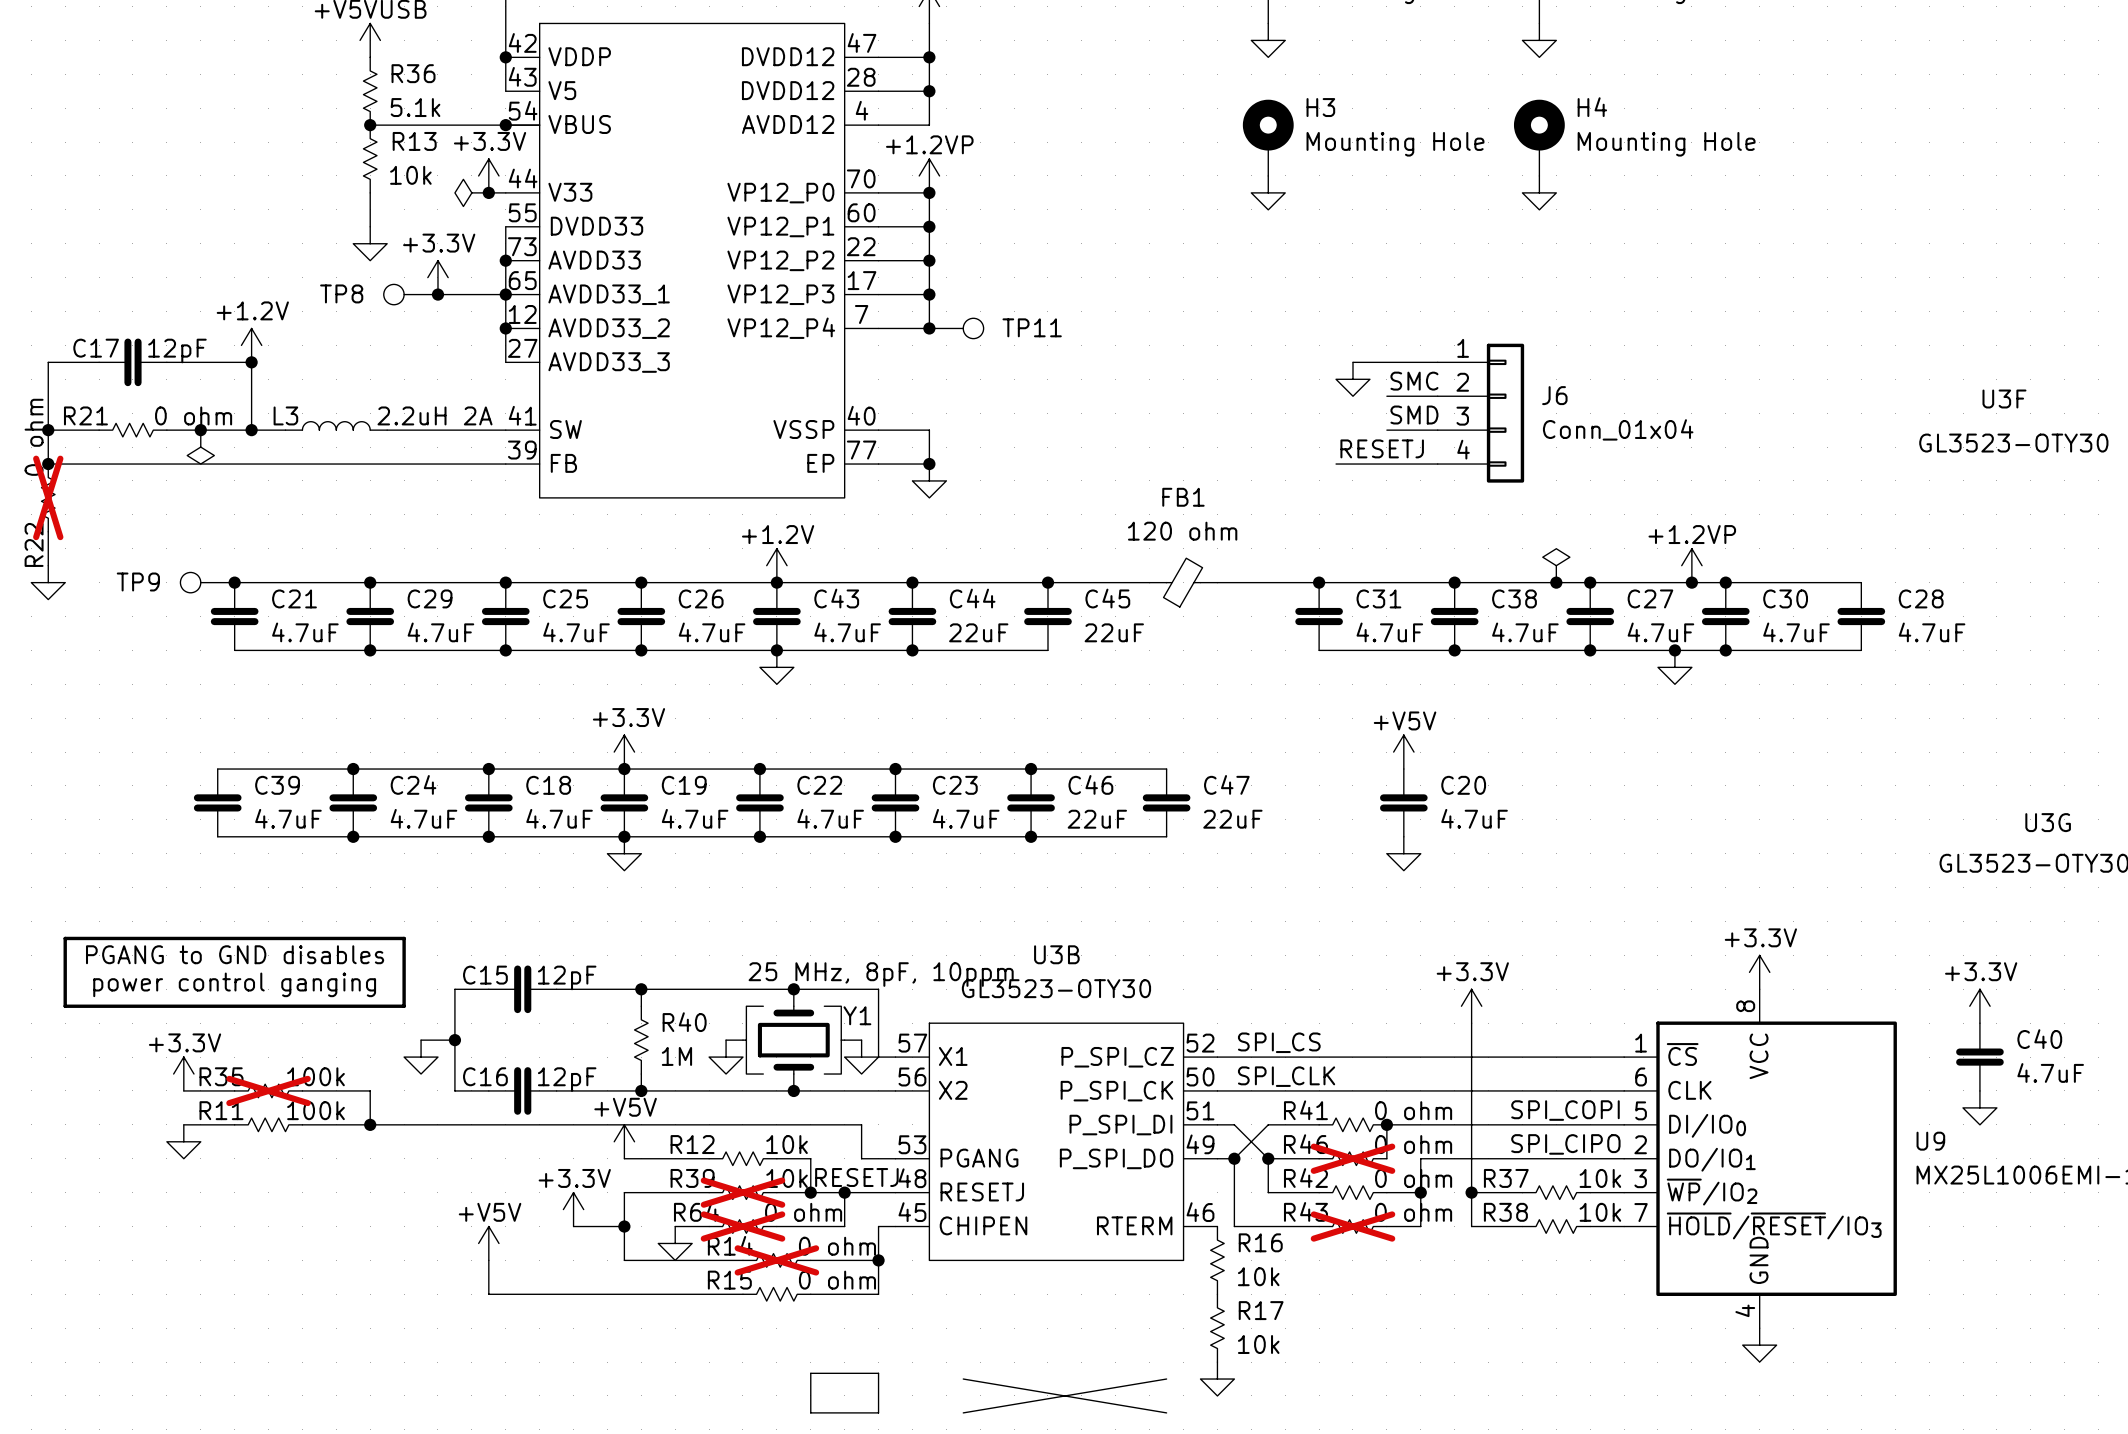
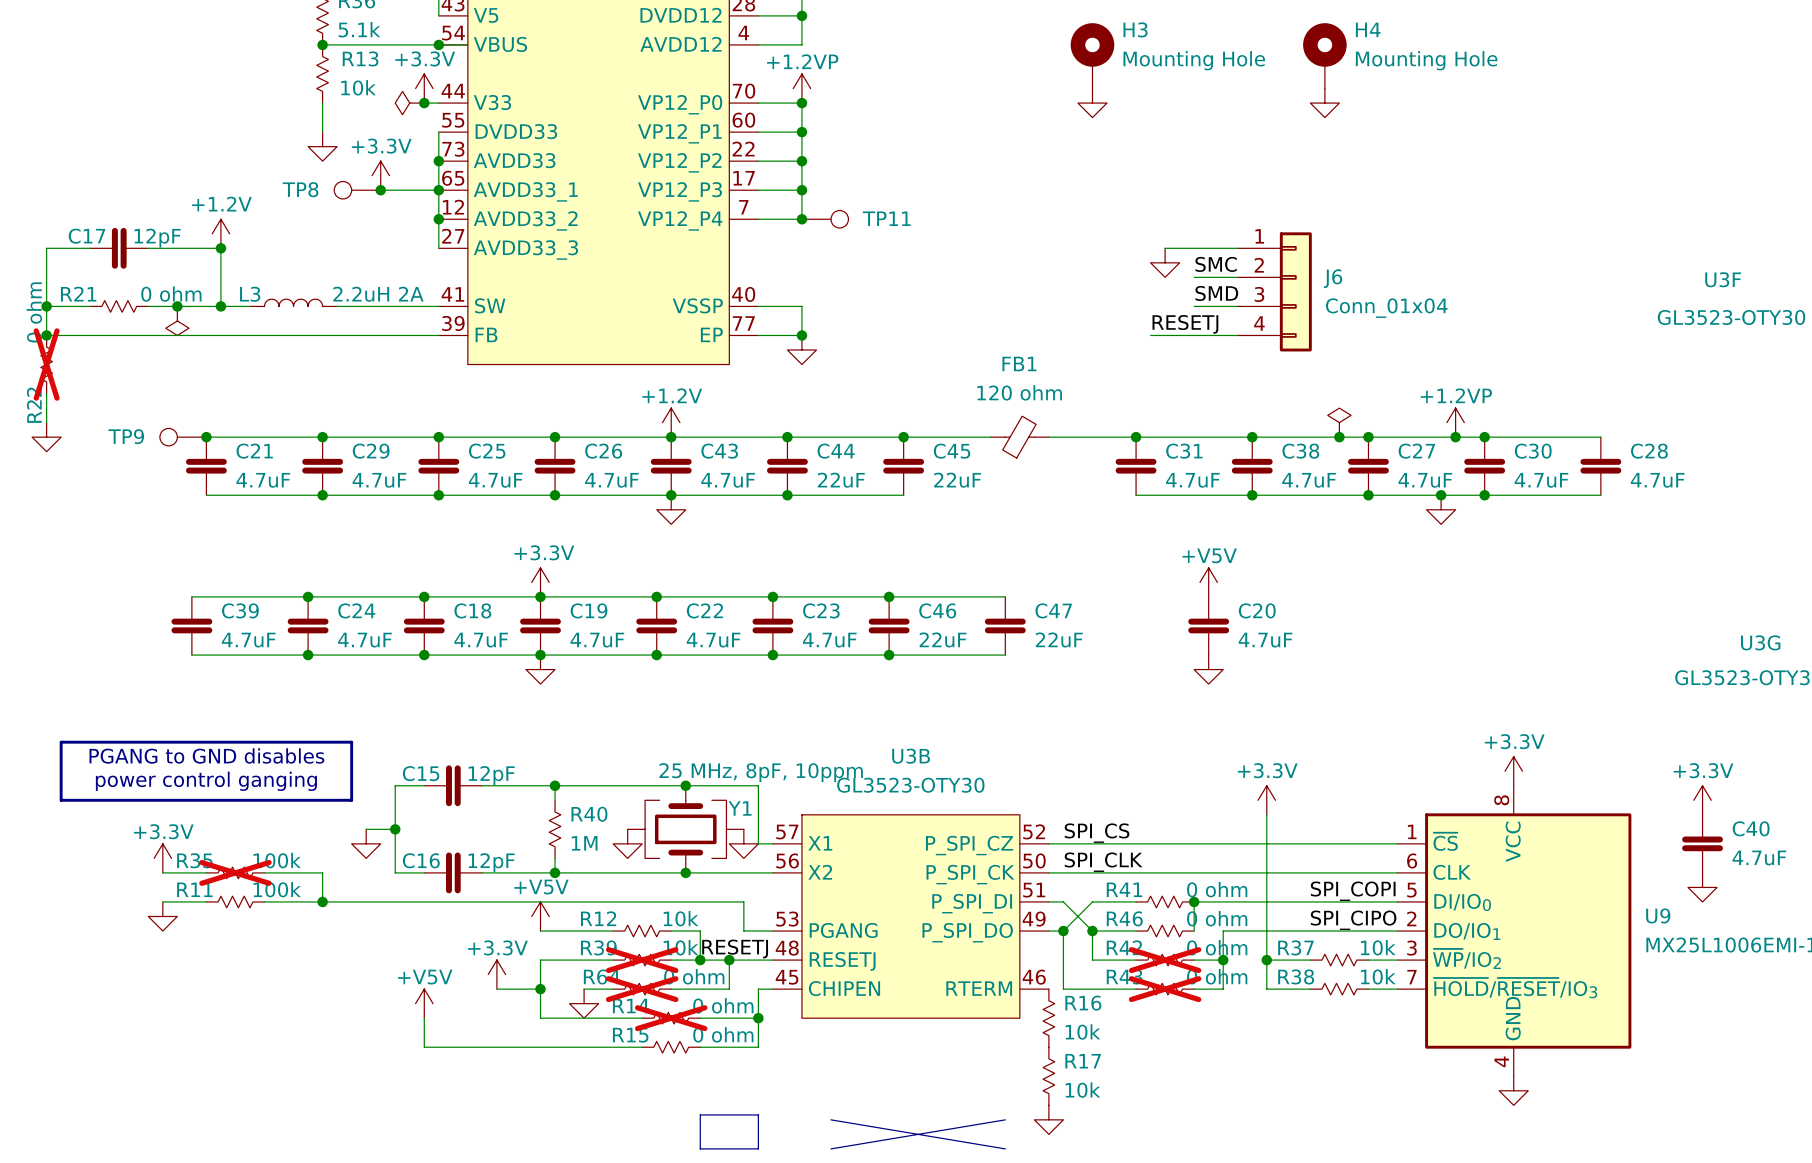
R46 do-not-place cross: (1352, 1158) -> none
R42 do-not-place cross: none -> (1165, 960)

